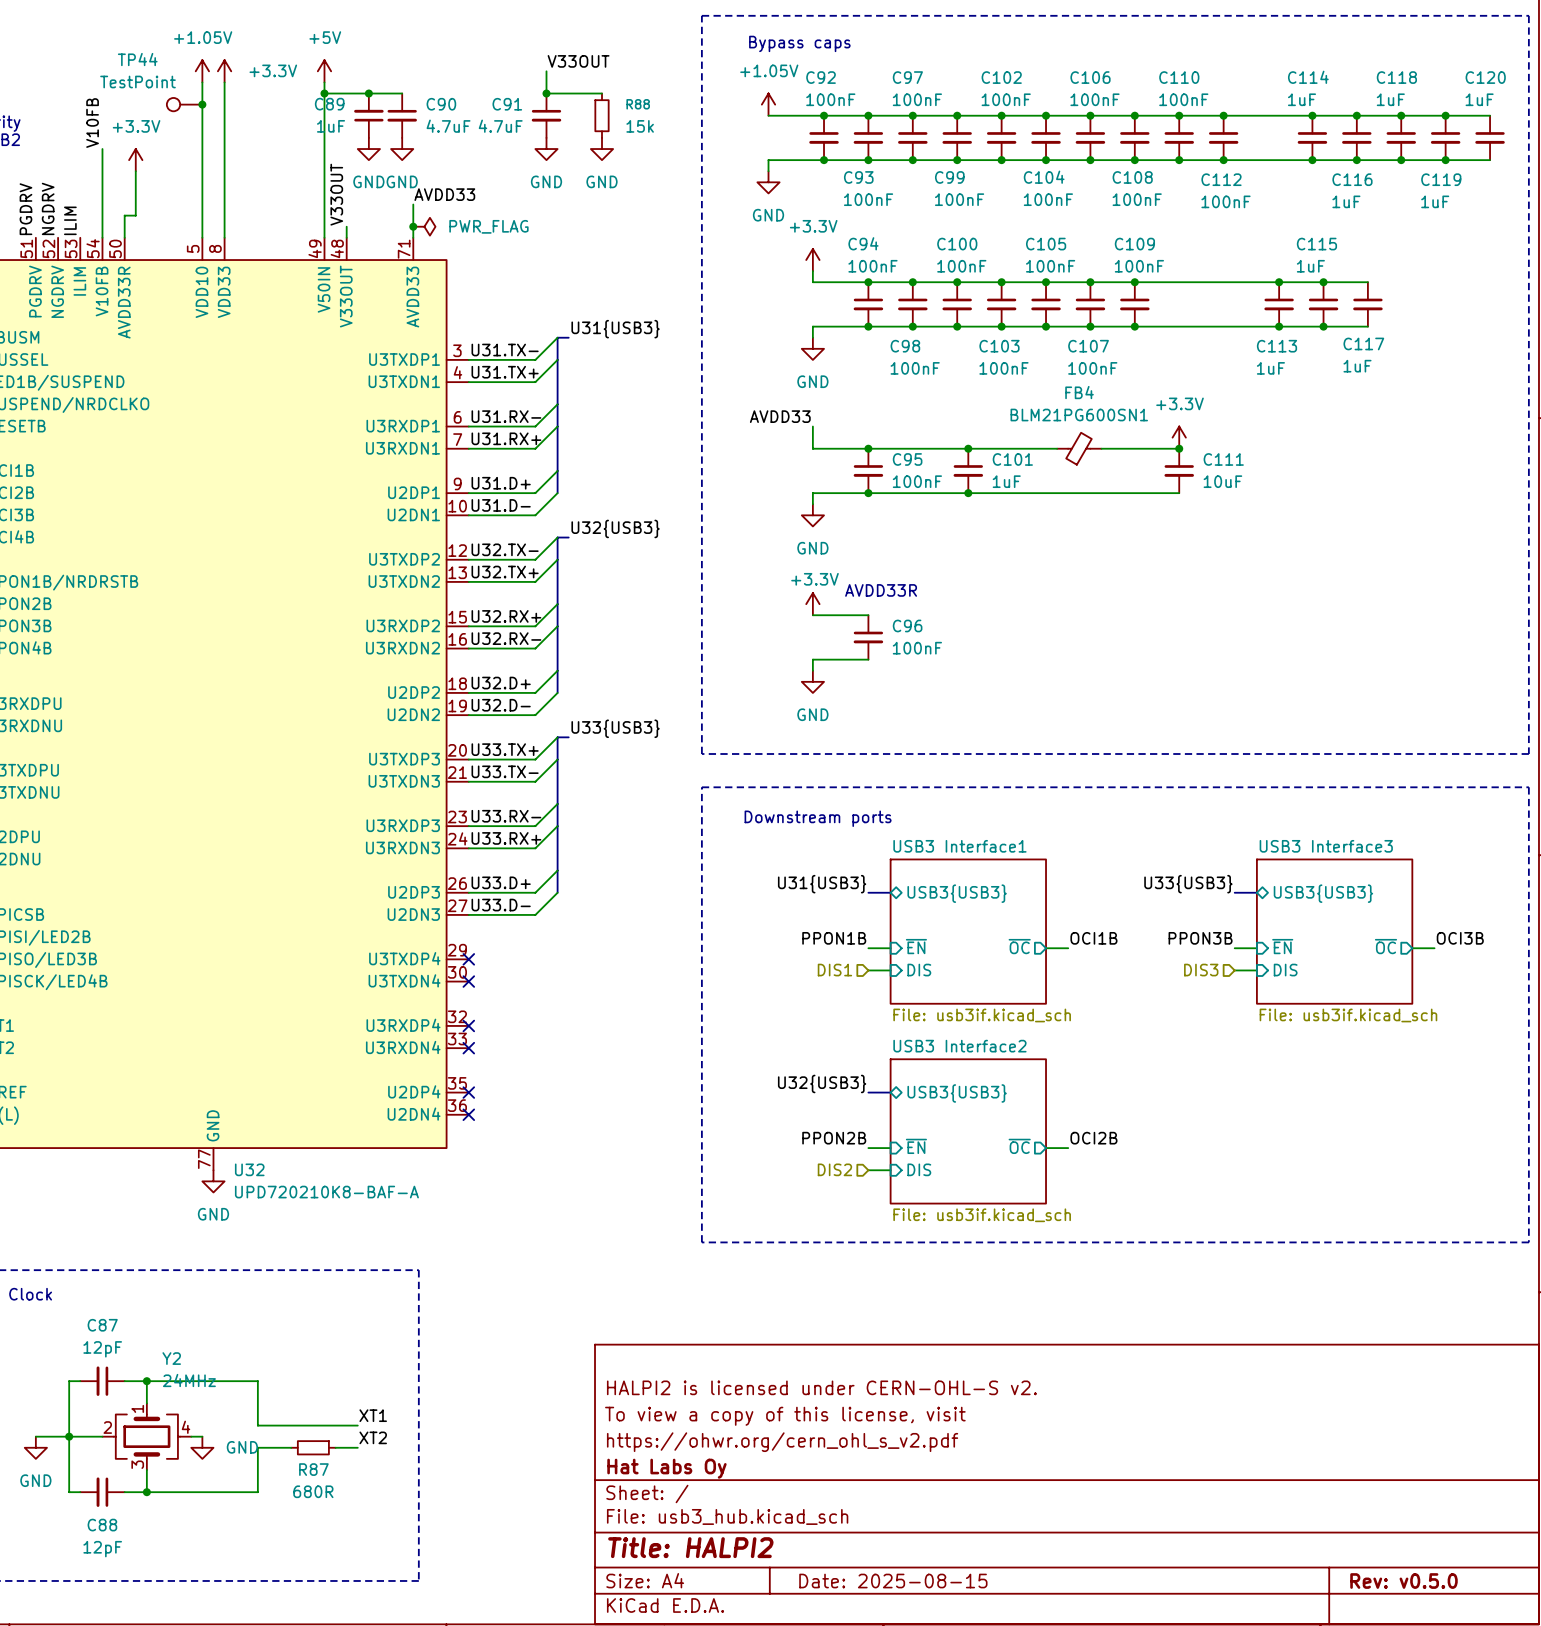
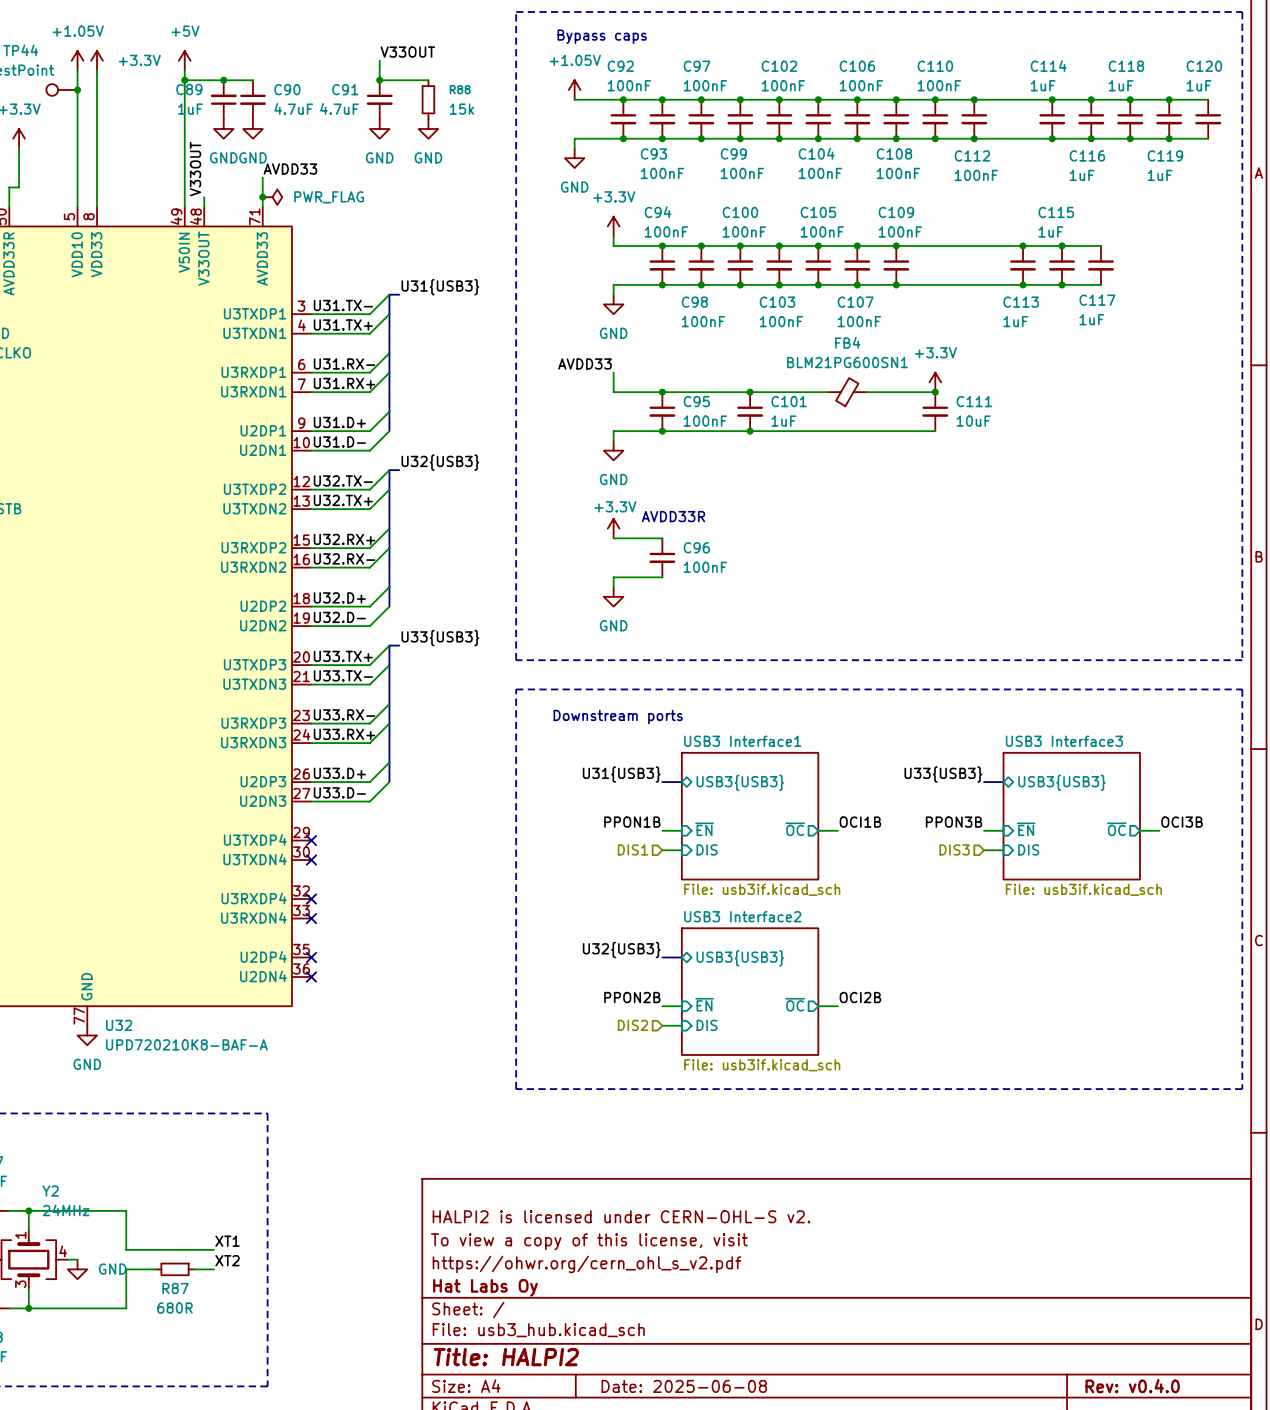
title block: Date: 2025-08-15 (893, 1581) -> Date: 2025-06-08 (684, 1386)
title block: Rev: v0.5.0 (1403, 1581) -> Rev: v0.4.0 (1132, 1386)

